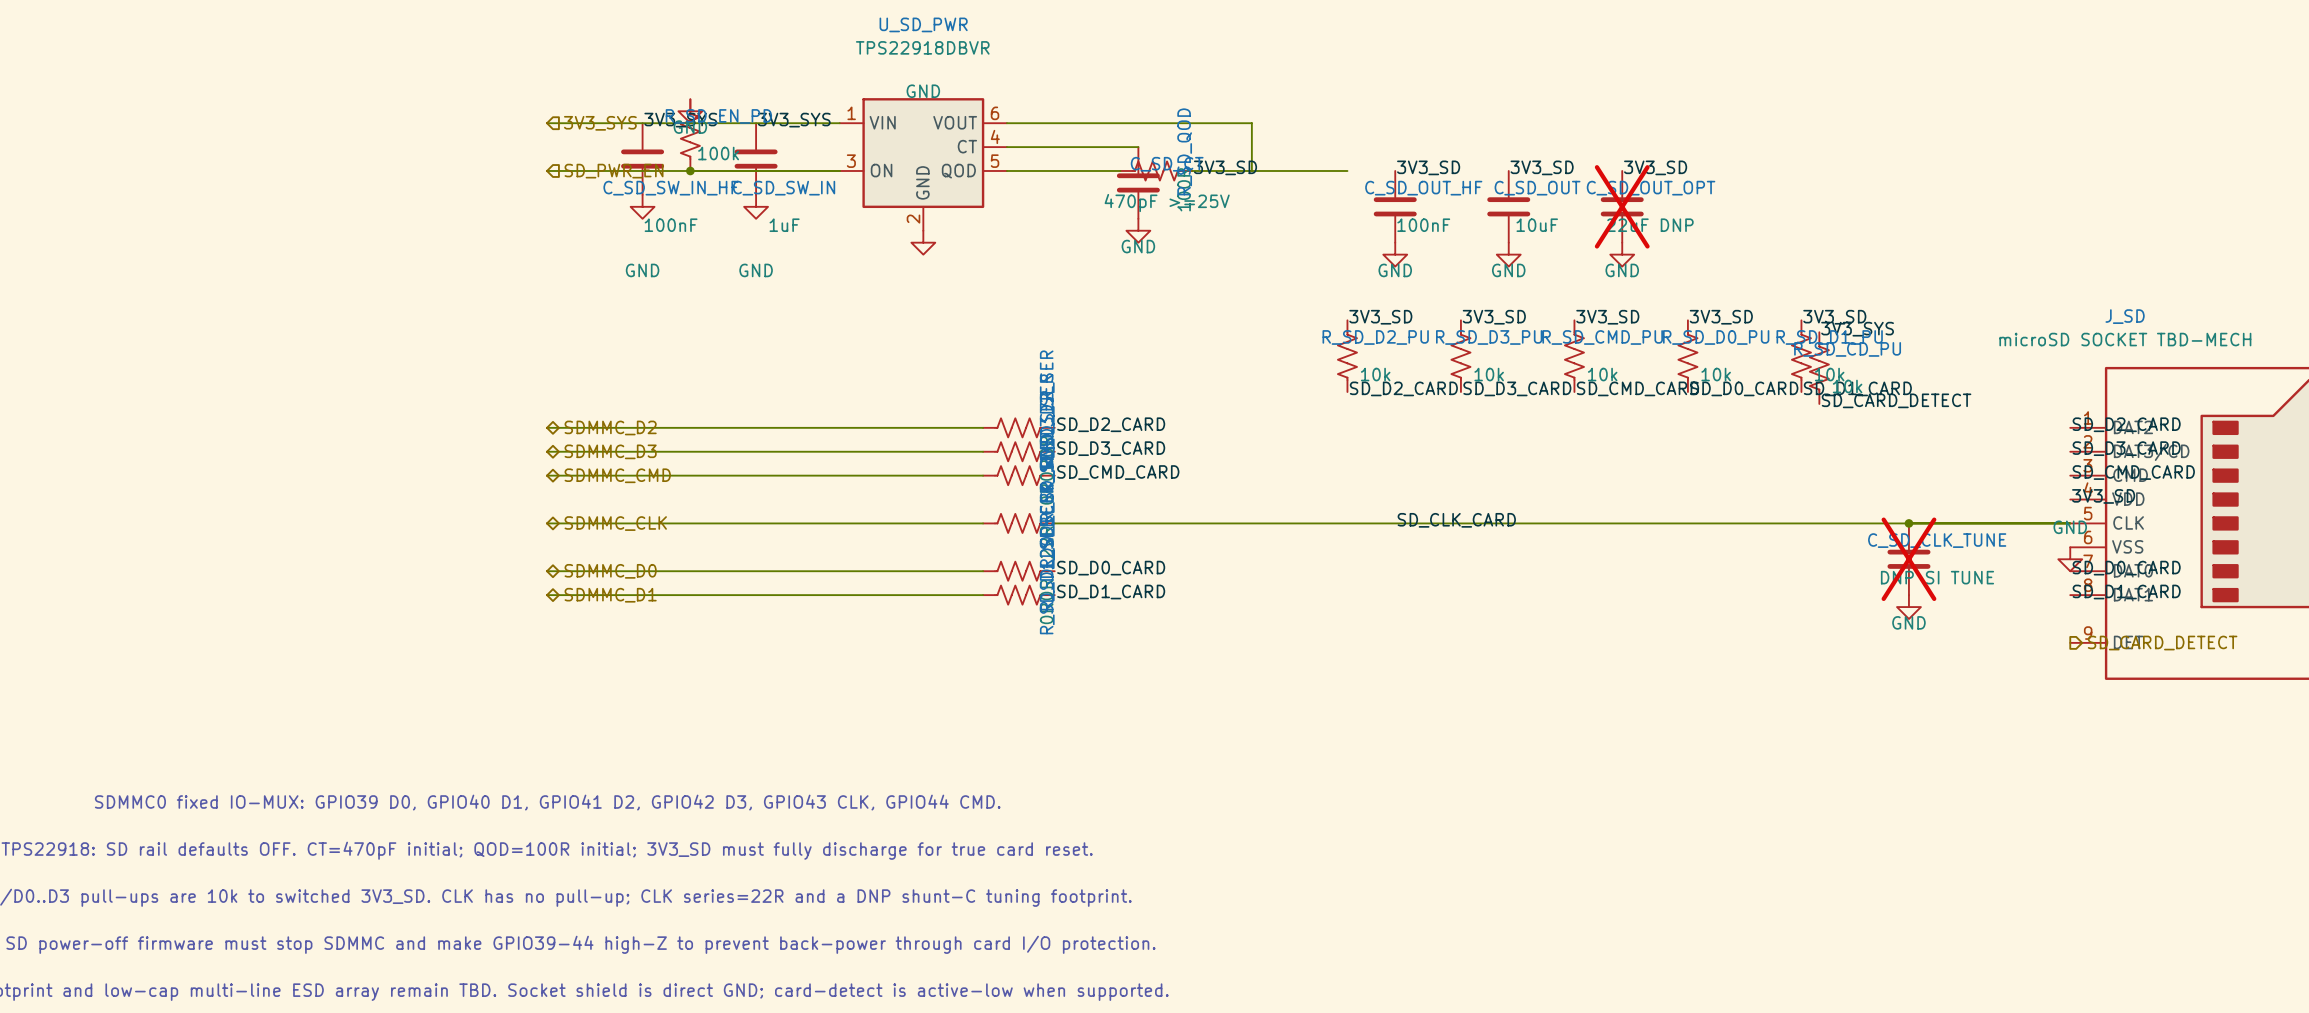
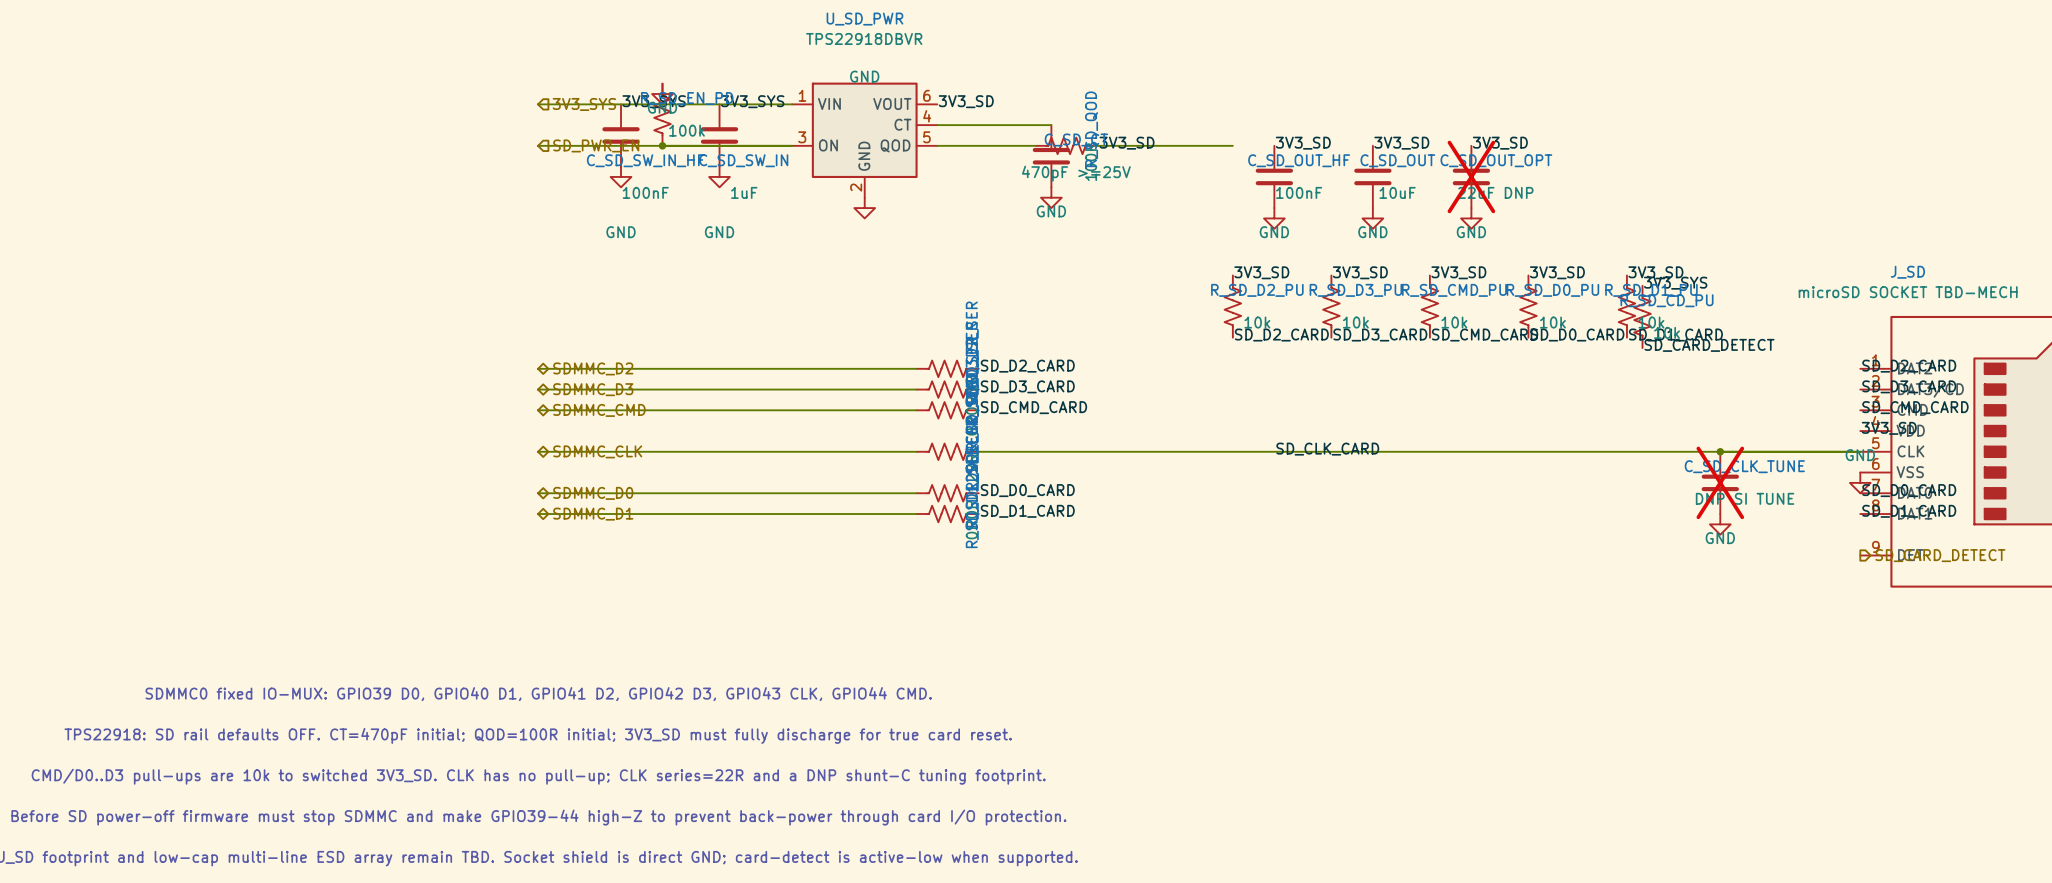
label: none -> 3V3_SD (966, 101)
wire: (1006, 123) (1251, 123) (1251, 170) -> none

